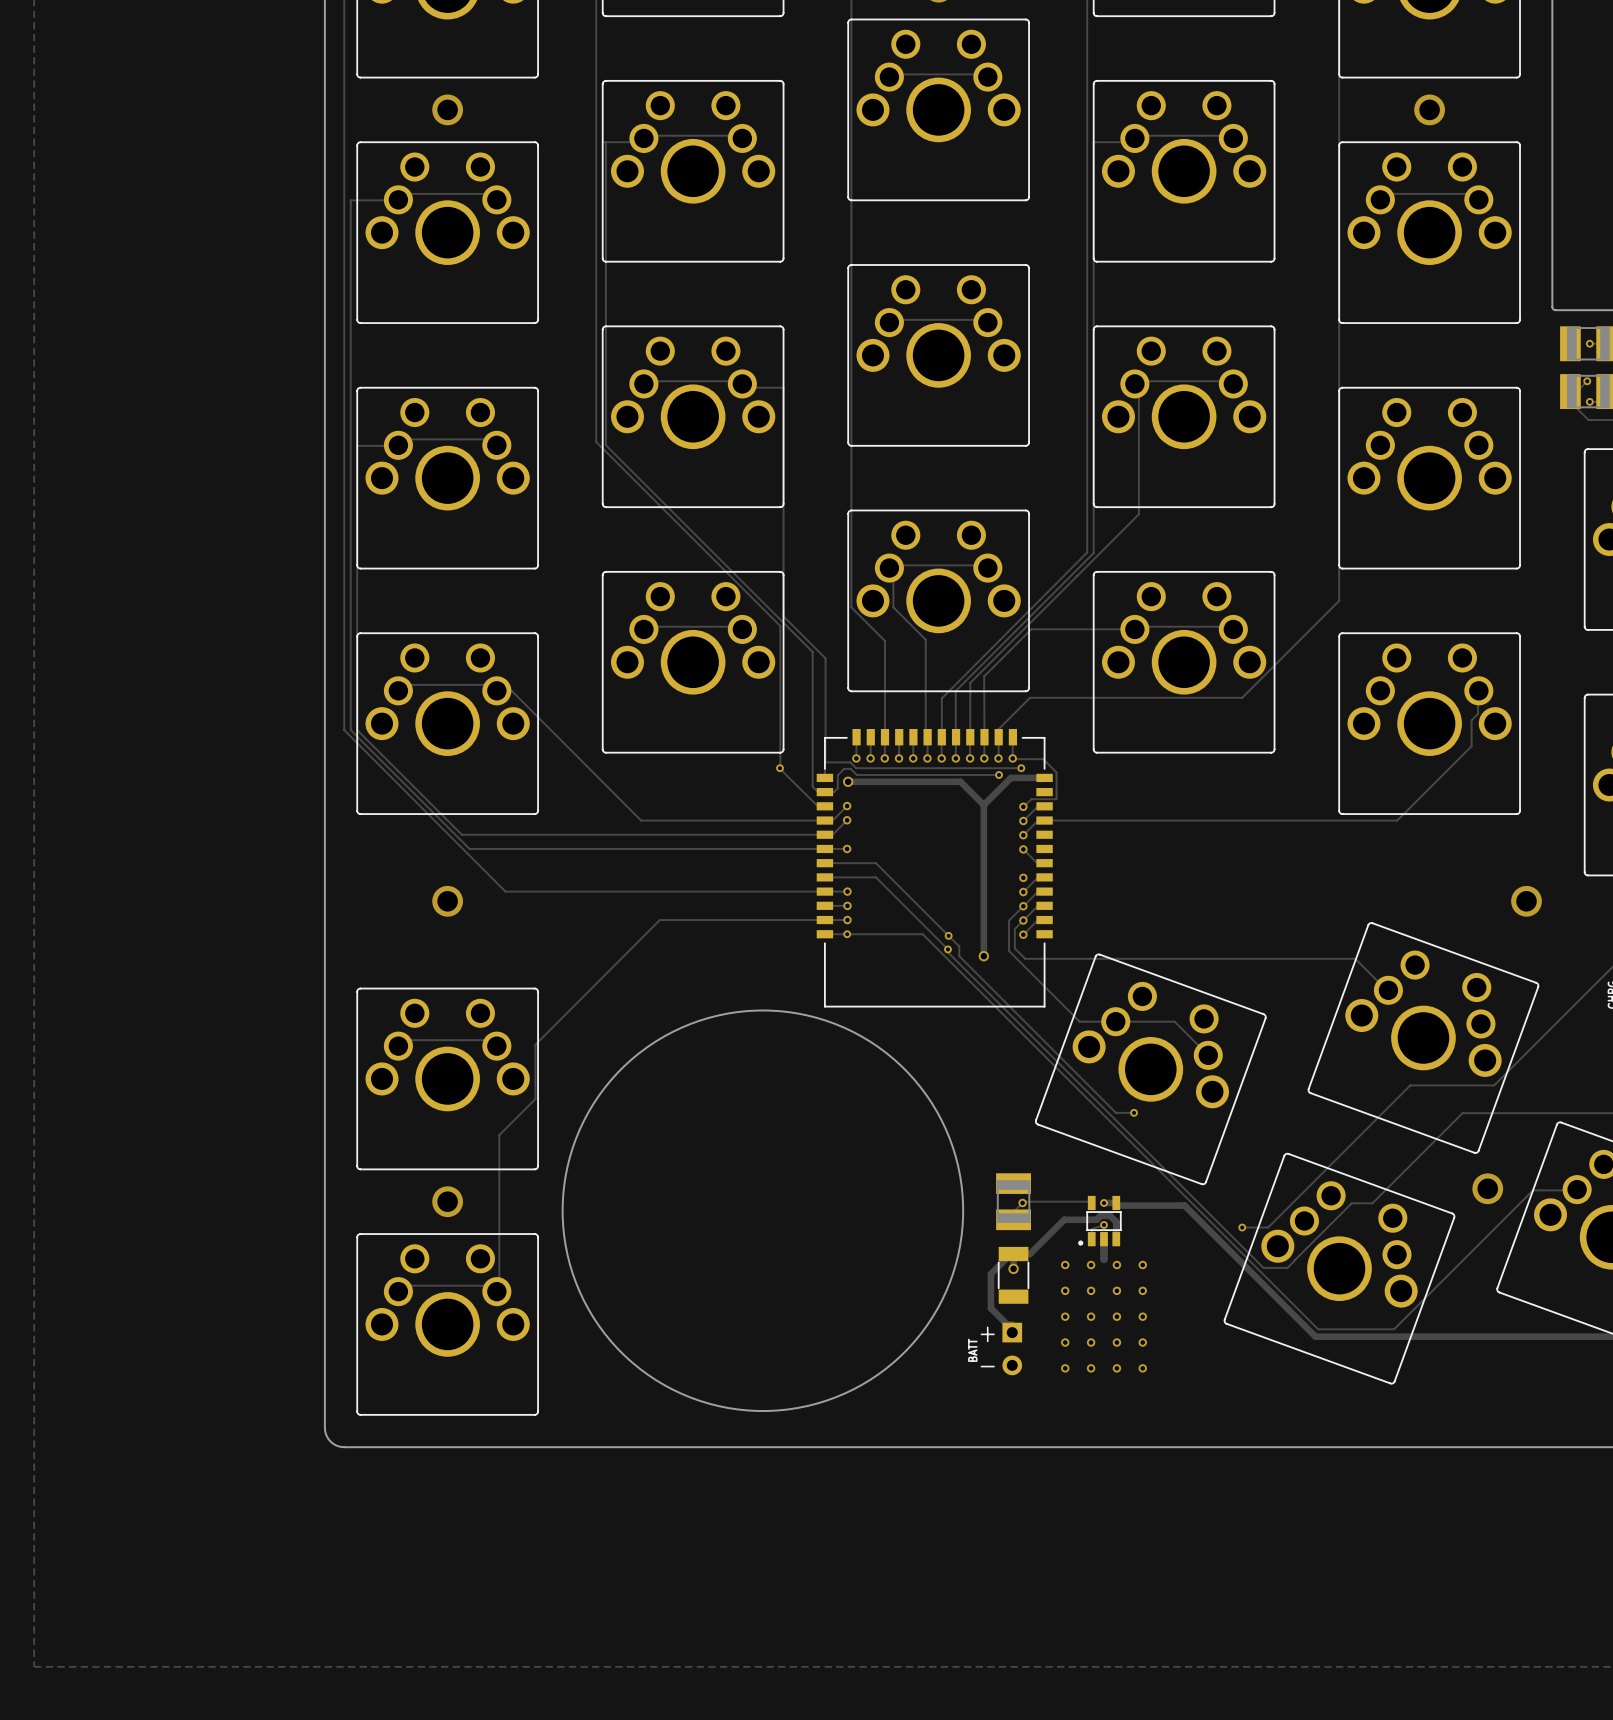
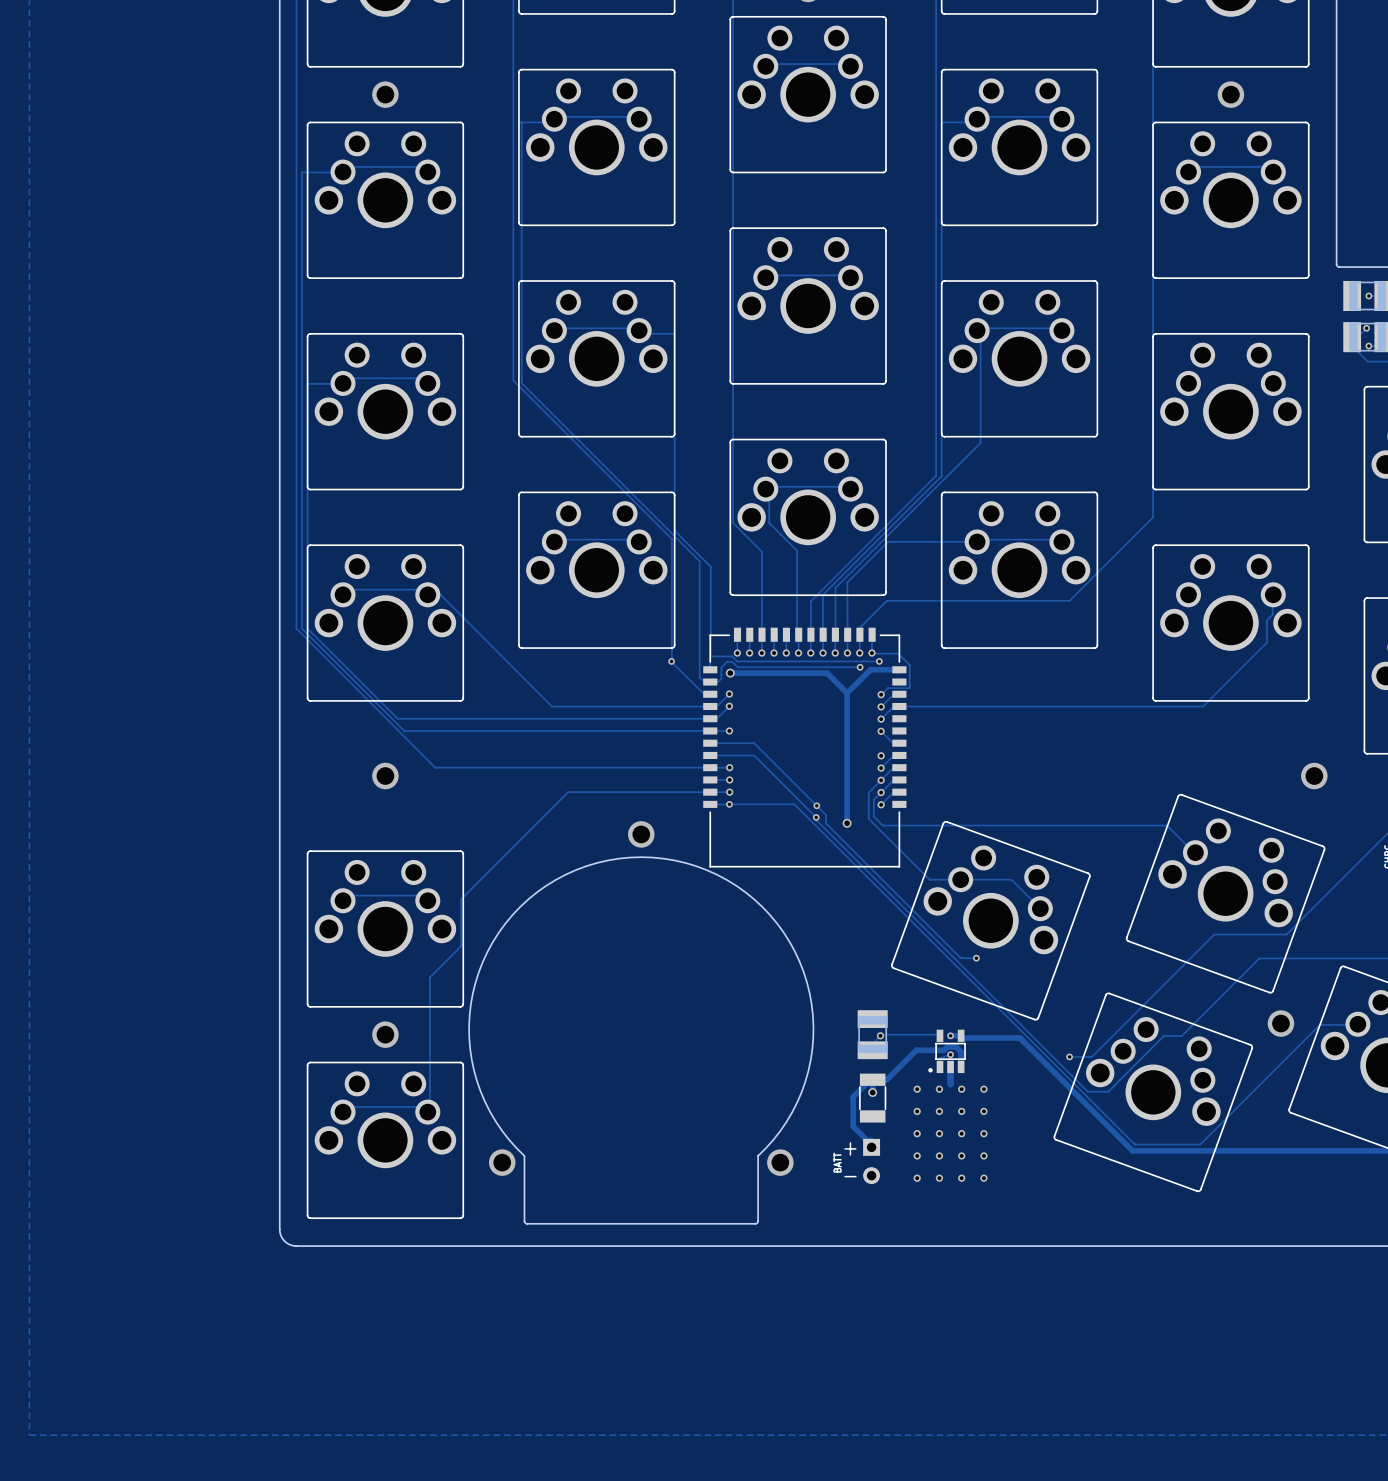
via: none -> (641, 834)
round board edge: [561, 1009, 965, 1413] -> none
board edge: none -> (524, 1155) (524, 1221) (526, 1223) (757, 1222) (758, 1155) (780, 1131) (801, 1092) (810, 1059) (813, 1026) (809, 993) (799, 961) (783, 932) (762, 906) (736, 885) (706, 870) (674, 860) (641, 857) (608, 860) (576, 870) (546, 885) (520, 906) (499, 932) (483, 961) (472, 993) (469, 1026) (471, 1059) (480, 1092) (502, 1131) (524, 1155)
via: none -> (502, 1162)
via: none -> (780, 1162)

